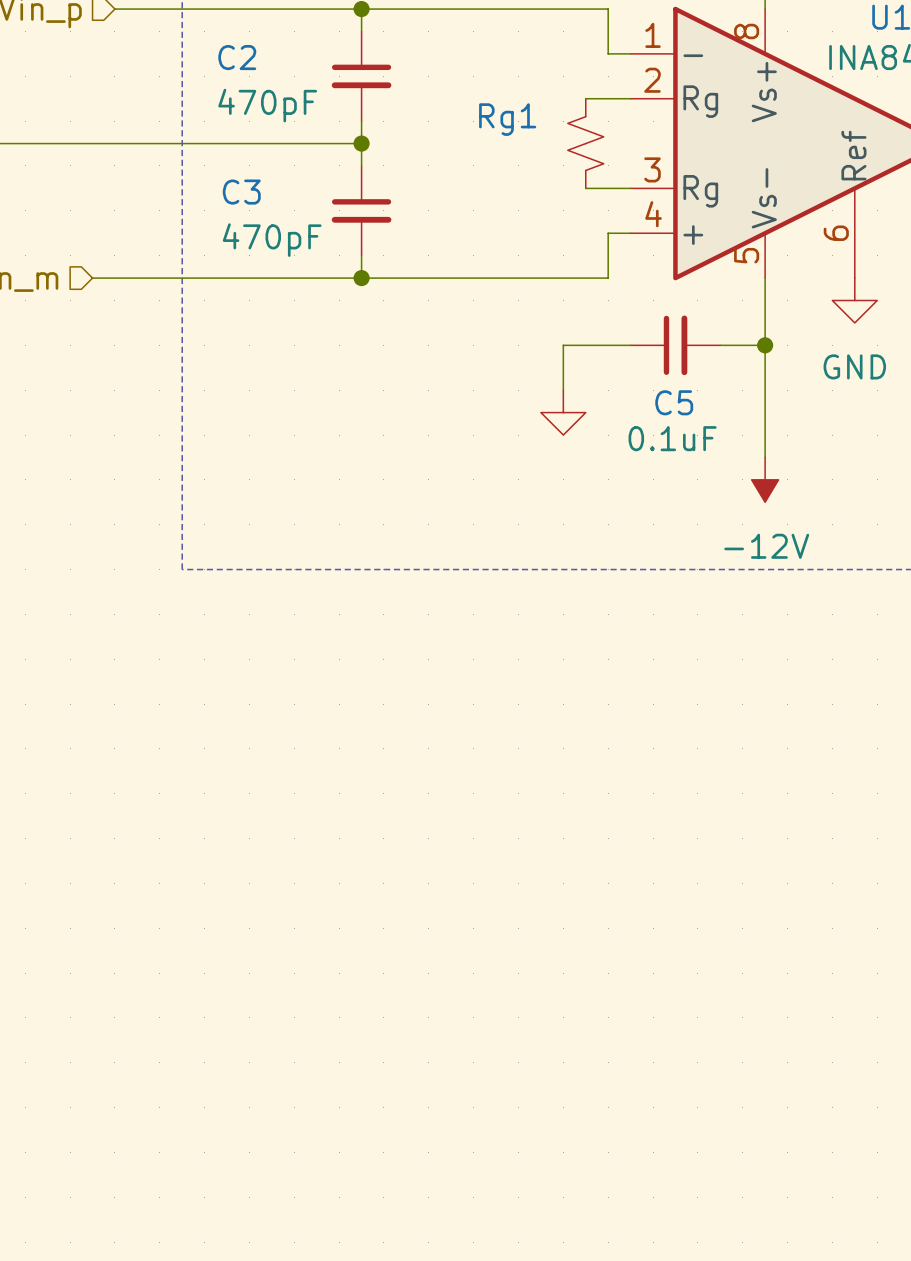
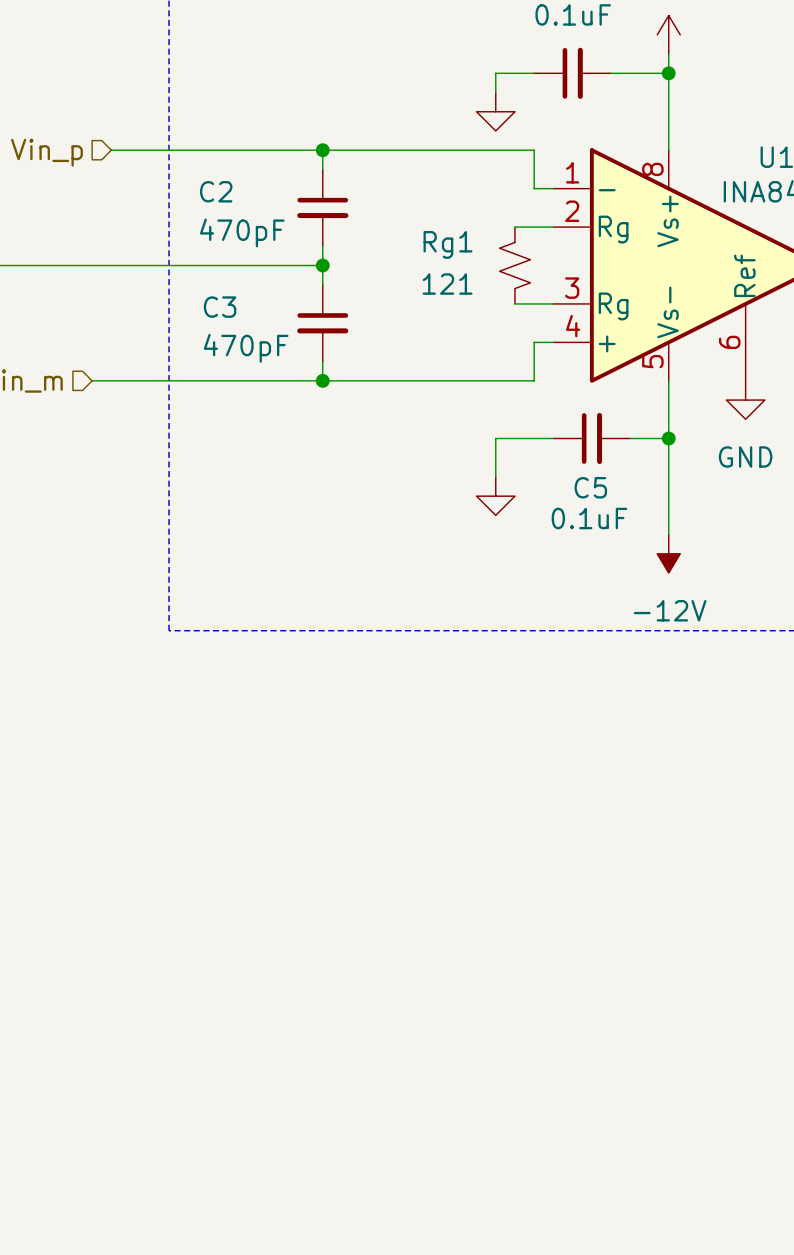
Rg1 value: none -> 121 (447, 284)

